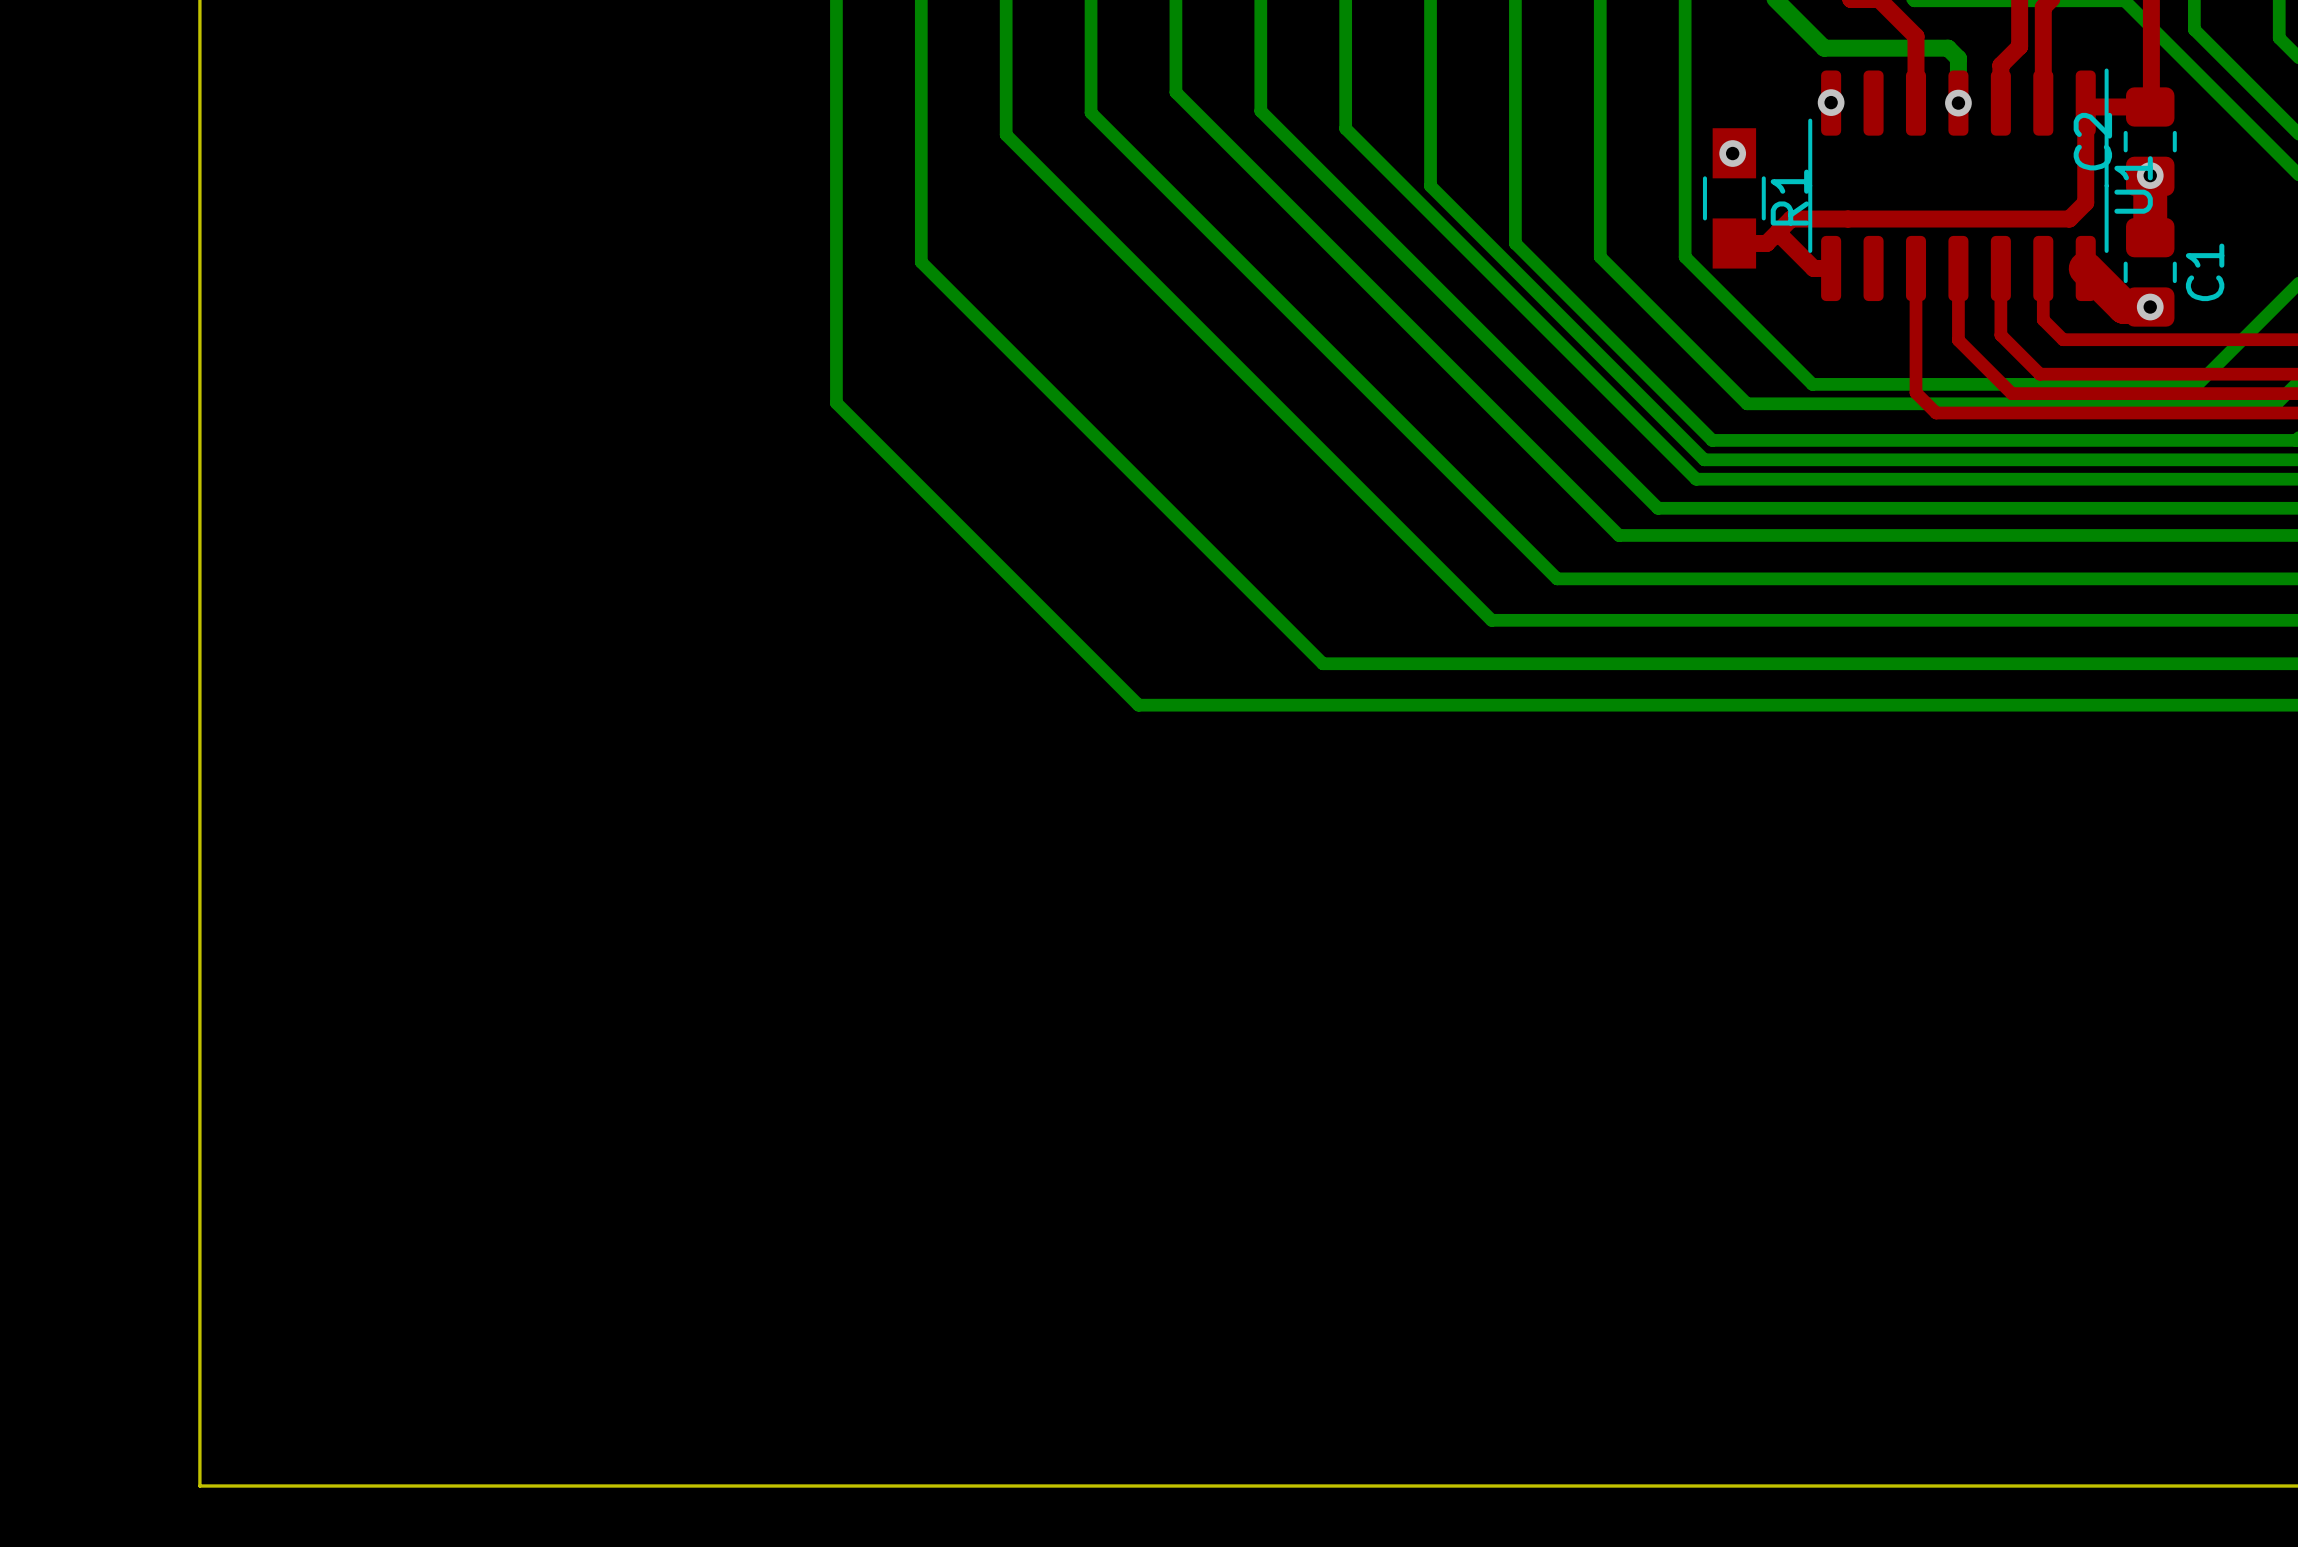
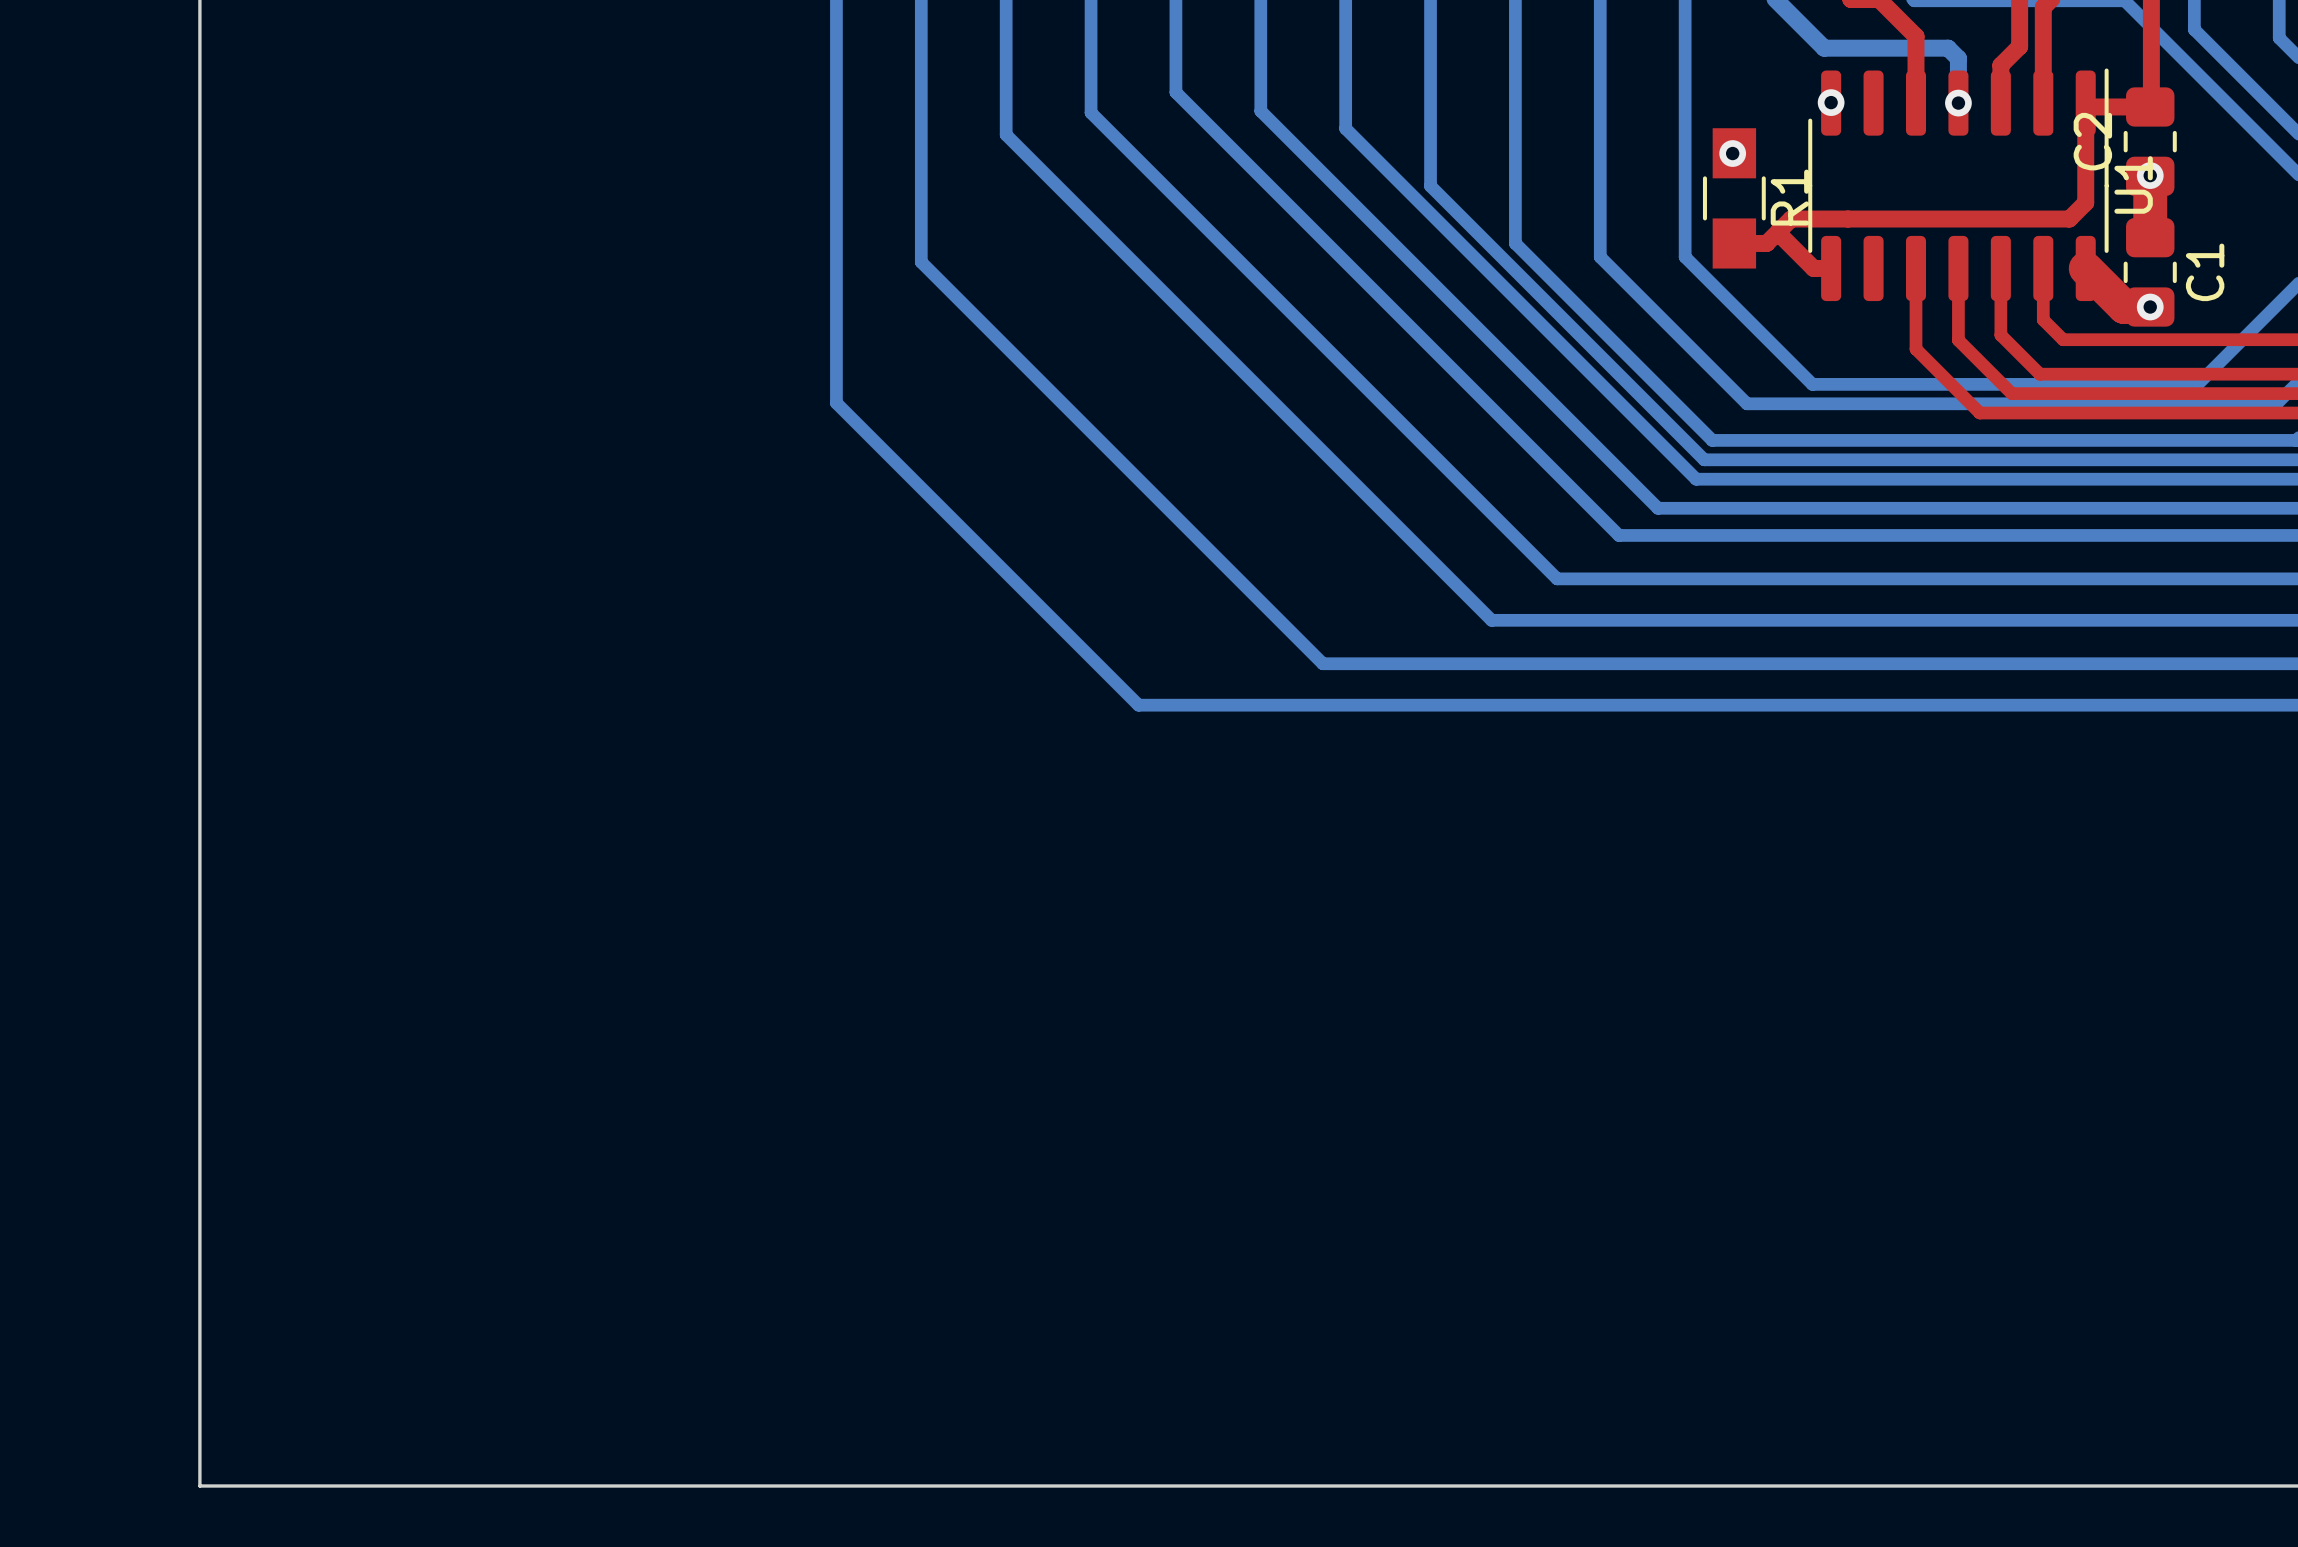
top track: (1915, 349) (1915, 392) (1936, 413) (1979, 413) -> (1915, 349) (1979, 413)

